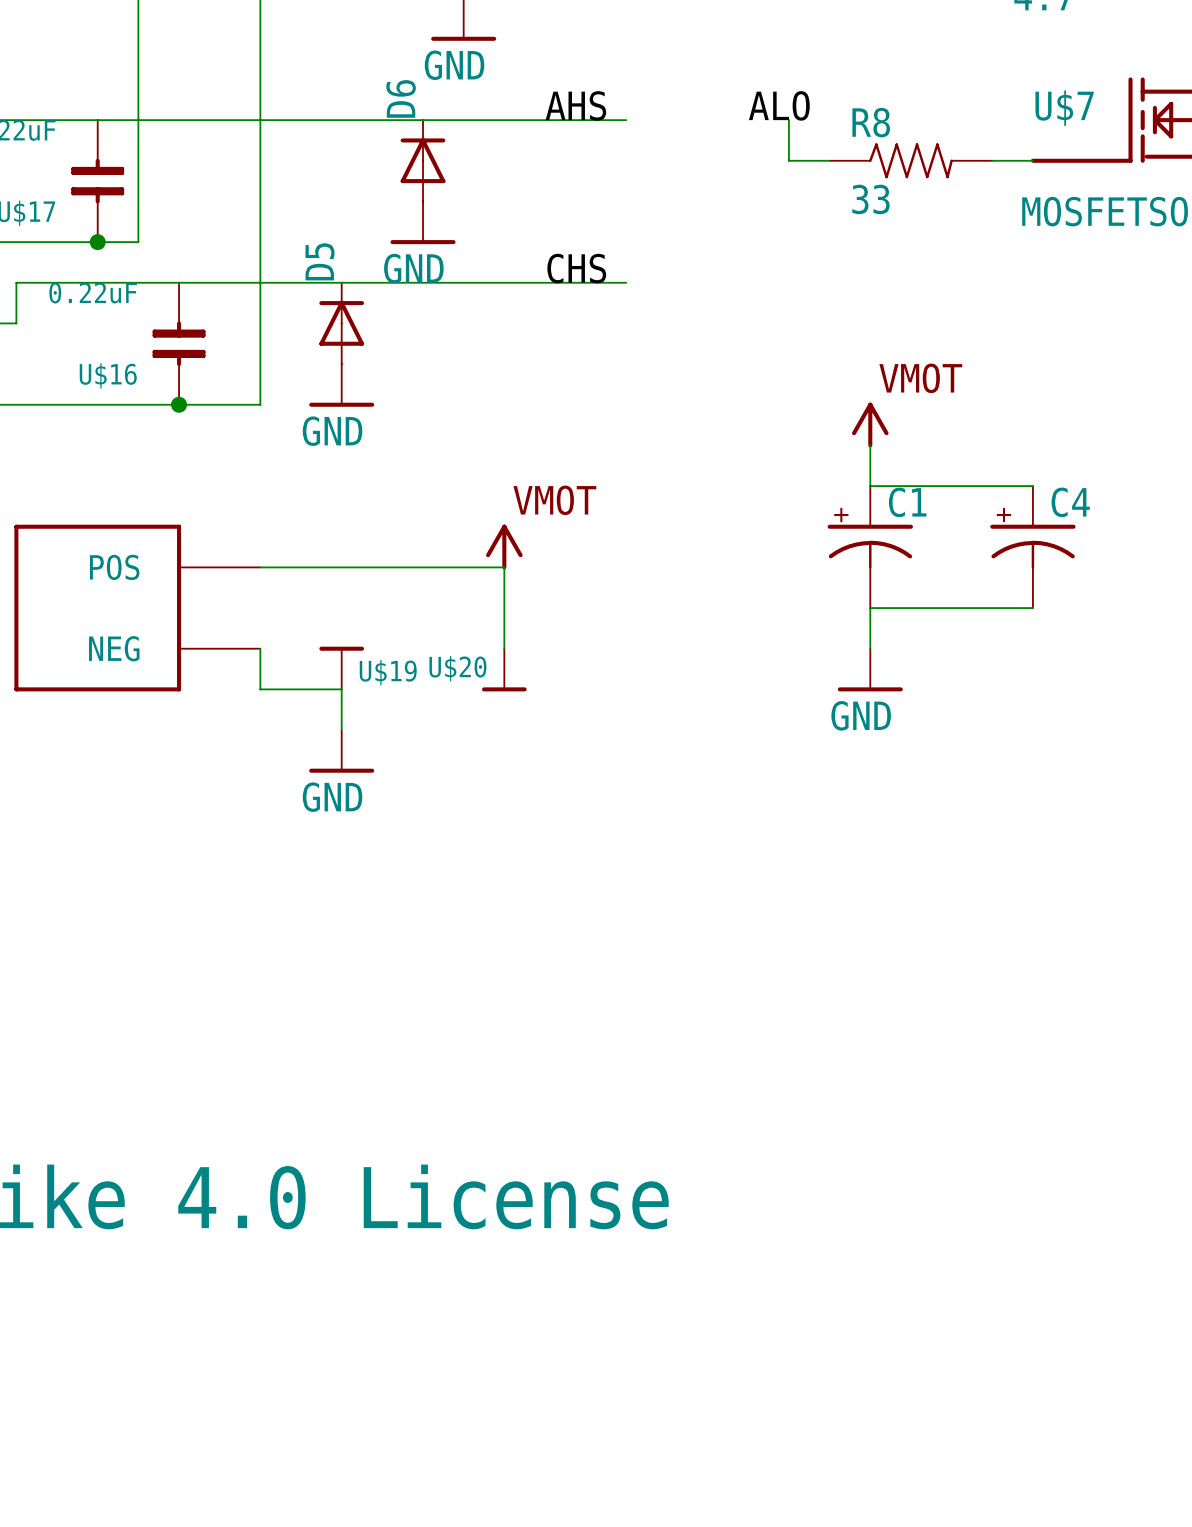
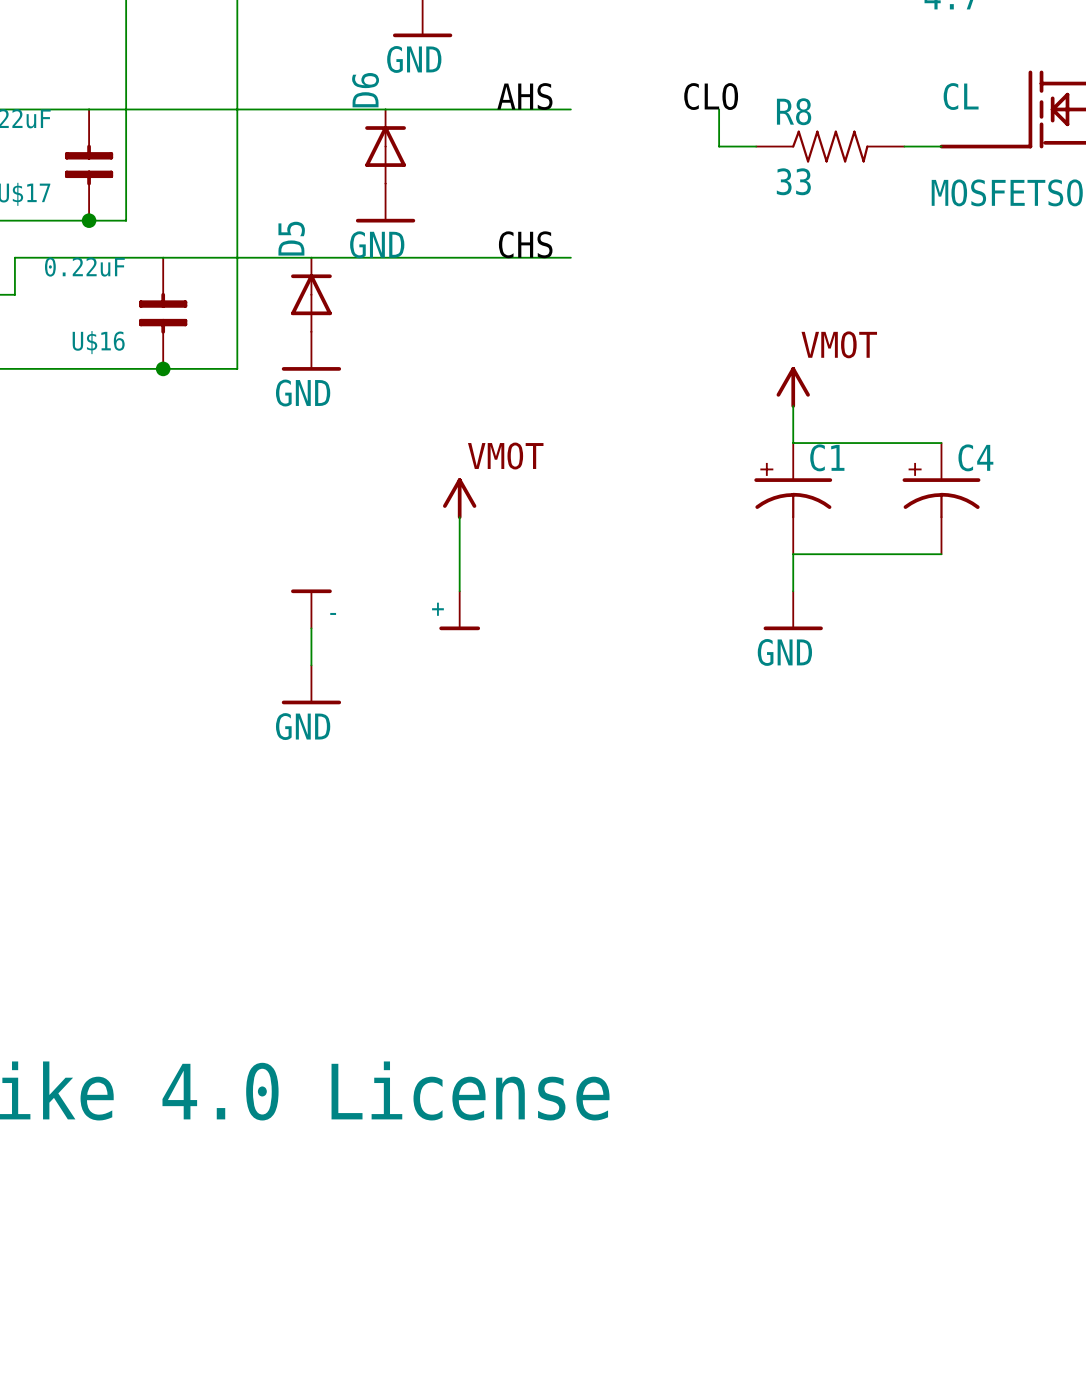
label: ALO (779, 105) -> CLO (711, 96)
U$7 name: U$7 (1064, 108) -> CL (961, 96)
wire: (260, 567) (504, 567) -> none
part: (137, 608) -> none
wire: (260, 648) (260, 689) (341, 689) -> none
U$20 name: U$20 (457, 668) -> + (437, 609)
U$19 name: U$19 (388, 672) -> - (333, 613)

